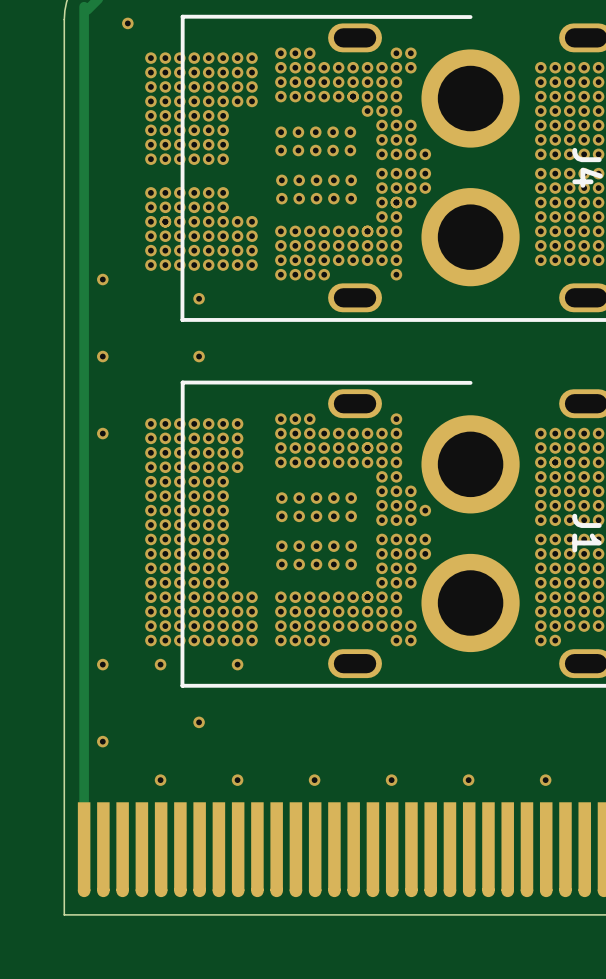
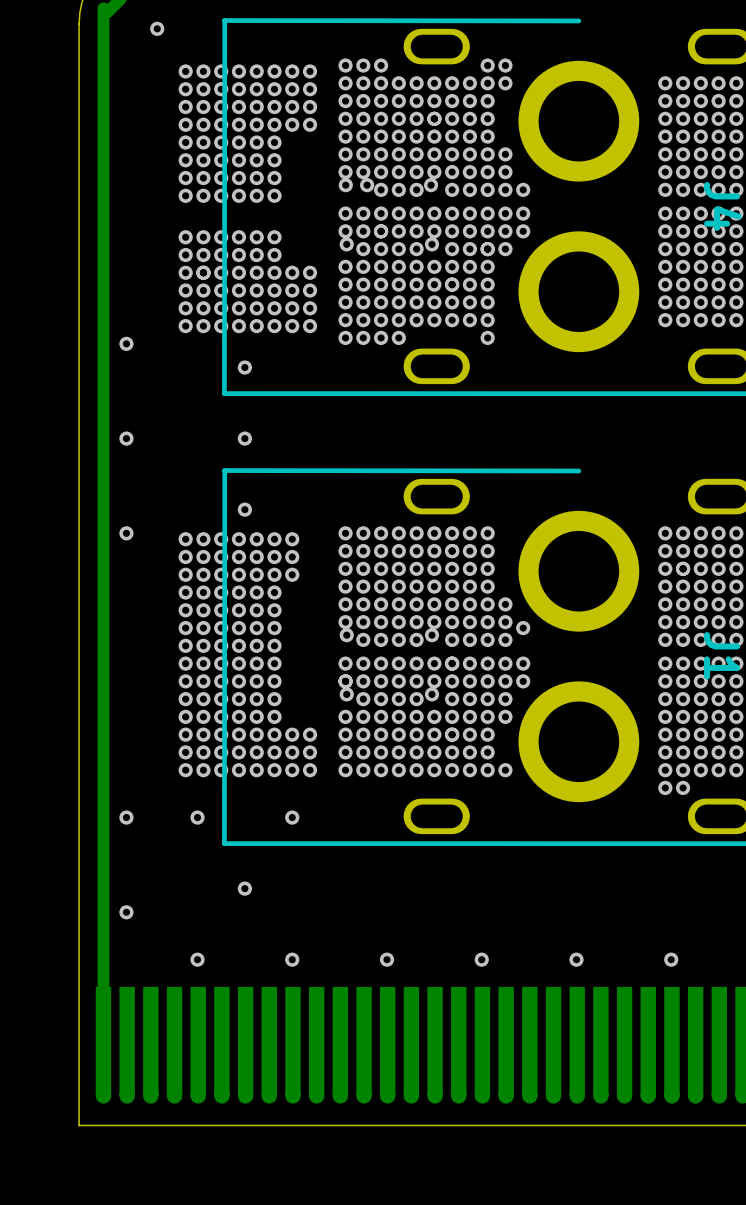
via: none -> (345, 136)
via: none -> (363, 136)
via: none -> (381, 136)
via: none -> (398, 136)
via: none -> (416, 136)
via: none -> (434, 136)
via: none -> (345, 154)
via: none -> (363, 154)
via: none -> (381, 154)
via: none -> (398, 154)
via: none -> (416, 154)
via: none -> (434, 154)
via: none -> (452, 154)
via: (281, 132) -> none
via: (298, 132) -> none
via: (315, 132) -> none
via: (333, 132) -> none
via: (350, 132) -> none
via: none -> (345, 172)
via: none -> (363, 172)
via: none -> (381, 172)
via: none -> (398, 172)
via: none -> (416, 172)
via: none -> (434, 172)
via: none -> (452, 172)
via: (315, 150) -> none
via: (333, 150) -> none
via: none -> (381, 189)
via: none -> (398, 189)
via: none -> (416, 189)
via: none -> (452, 189)
via: none -> (345, 213)
via: none -> (363, 213)
via: none -> (381, 213)
via: none -> (398, 213)
via: none -> (416, 213)
via: none -> (434, 213)
via: none -> (452, 213)
via: (281, 180) -> none
via: (299, 180) -> none
via: (316, 180) -> none
via: (333, 180) -> none
via: (351, 180) -> none
via: none -> (345, 231)
via: none -> (363, 231)
via: none -> (381, 231)
via: none -> (398, 231)
via: none -> (416, 231)
via: none -> (434, 231)
via: none -> (452, 231)
via: (299, 198) -> none
via: (316, 198) -> none
via: (333, 198) -> none
via: none -> (363, 249)
via: none -> (381, 249)
via: none -> (398, 249)
via: none -> (416, 249)
via: none -> (452, 249)
via: none -> (345, 266)
via: none -> (363, 266)
via: none -> (381, 266)
via: none -> (398, 266)
via: none -> (416, 266)
via: none -> (434, 266)
via: none -> (452, 266)
via: none -> (244, 509)
via: (280, 419) -> none
via: (295, 419) -> none
via: (309, 419) -> none
via: (396, 419) -> none
via: (150, 423) -> none
via: (165, 423) -> none
via: (179, 423) -> none
via: (194, 423) -> none
via: (208, 423) -> none
via: (223, 423) -> none
via: (237, 423) -> none
via: none -> (345, 586)
via: none -> (363, 586)
via: none -> (381, 586)
via: none -> (398, 586)
via: none -> (416, 586)
via: none -> (434, 586)
via: none -> (452, 586)
via: none -> (345, 604)
via: none -> (363, 604)
via: none -> (381, 604)
via: none -> (398, 604)
via: none -> (416, 604)
via: none -> (434, 604)
via: none -> (452, 604)
via: (281, 498) -> none
via: (299, 498) -> none
via: (316, 498) -> none
via: (333, 498) -> none
via: (351, 498) -> none
via: none -> (345, 622)
via: none -> (363, 622)
via: none -> (381, 622)
via: none -> (398, 622)
via: none -> (416, 622)
via: none -> (434, 622)
via: none -> (452, 622)
via: (299, 516) -> none
via: (316, 516) -> none
via: (333, 516) -> none
via: none -> (363, 639)
via: none -> (381, 639)
via: none -> (398, 639)
via: none -> (416, 639)
via: none -> (452, 639)
via: none -> (345, 663)
via: none -> (363, 663)
via: none -> (381, 663)
via: none -> (398, 663)
via: none -> (416, 663)
via: none -> (434, 663)
via: none -> (452, 663)
via: (281, 546) -> none
via: (299, 546) -> none
via: (316, 546) -> none
via: (333, 546) -> none
via: (351, 546) -> none
via: none -> (345, 681)
via: none -> (363, 681)
via: none -> (381, 681)
via: none -> (398, 681)
via: none -> (416, 681)
via: none -> (434, 681)
via: none -> (452, 681)
via: (299, 564) -> none
via: (316, 564) -> none
via: (333, 564) -> none
via: none -> (363, 699)
via: none -> (381, 699)
via: none -> (398, 699)
via: none -> (416, 699)
via: none -> (452, 699)
via: none -> (345, 716)
via: none -> (363, 716)
via: none -> (381, 716)
via: none -> (398, 716)
via: none -> (416, 716)
via: none -> (434, 716)
via: none -> (452, 716)
via: (150, 640) -> none
via: (165, 640) -> none
via: (179, 640) -> none
via: (194, 640) -> none
via: (208, 640) -> none
via: (223, 640) -> none
via: (237, 640) -> none
via: (252, 640) -> none
via: (280, 640) -> none
via: (295, 640) -> none
via: (309, 640) -> none
via: (324, 640) -> none
via: (396, 640) -> none
via: (410, 640) -> none

